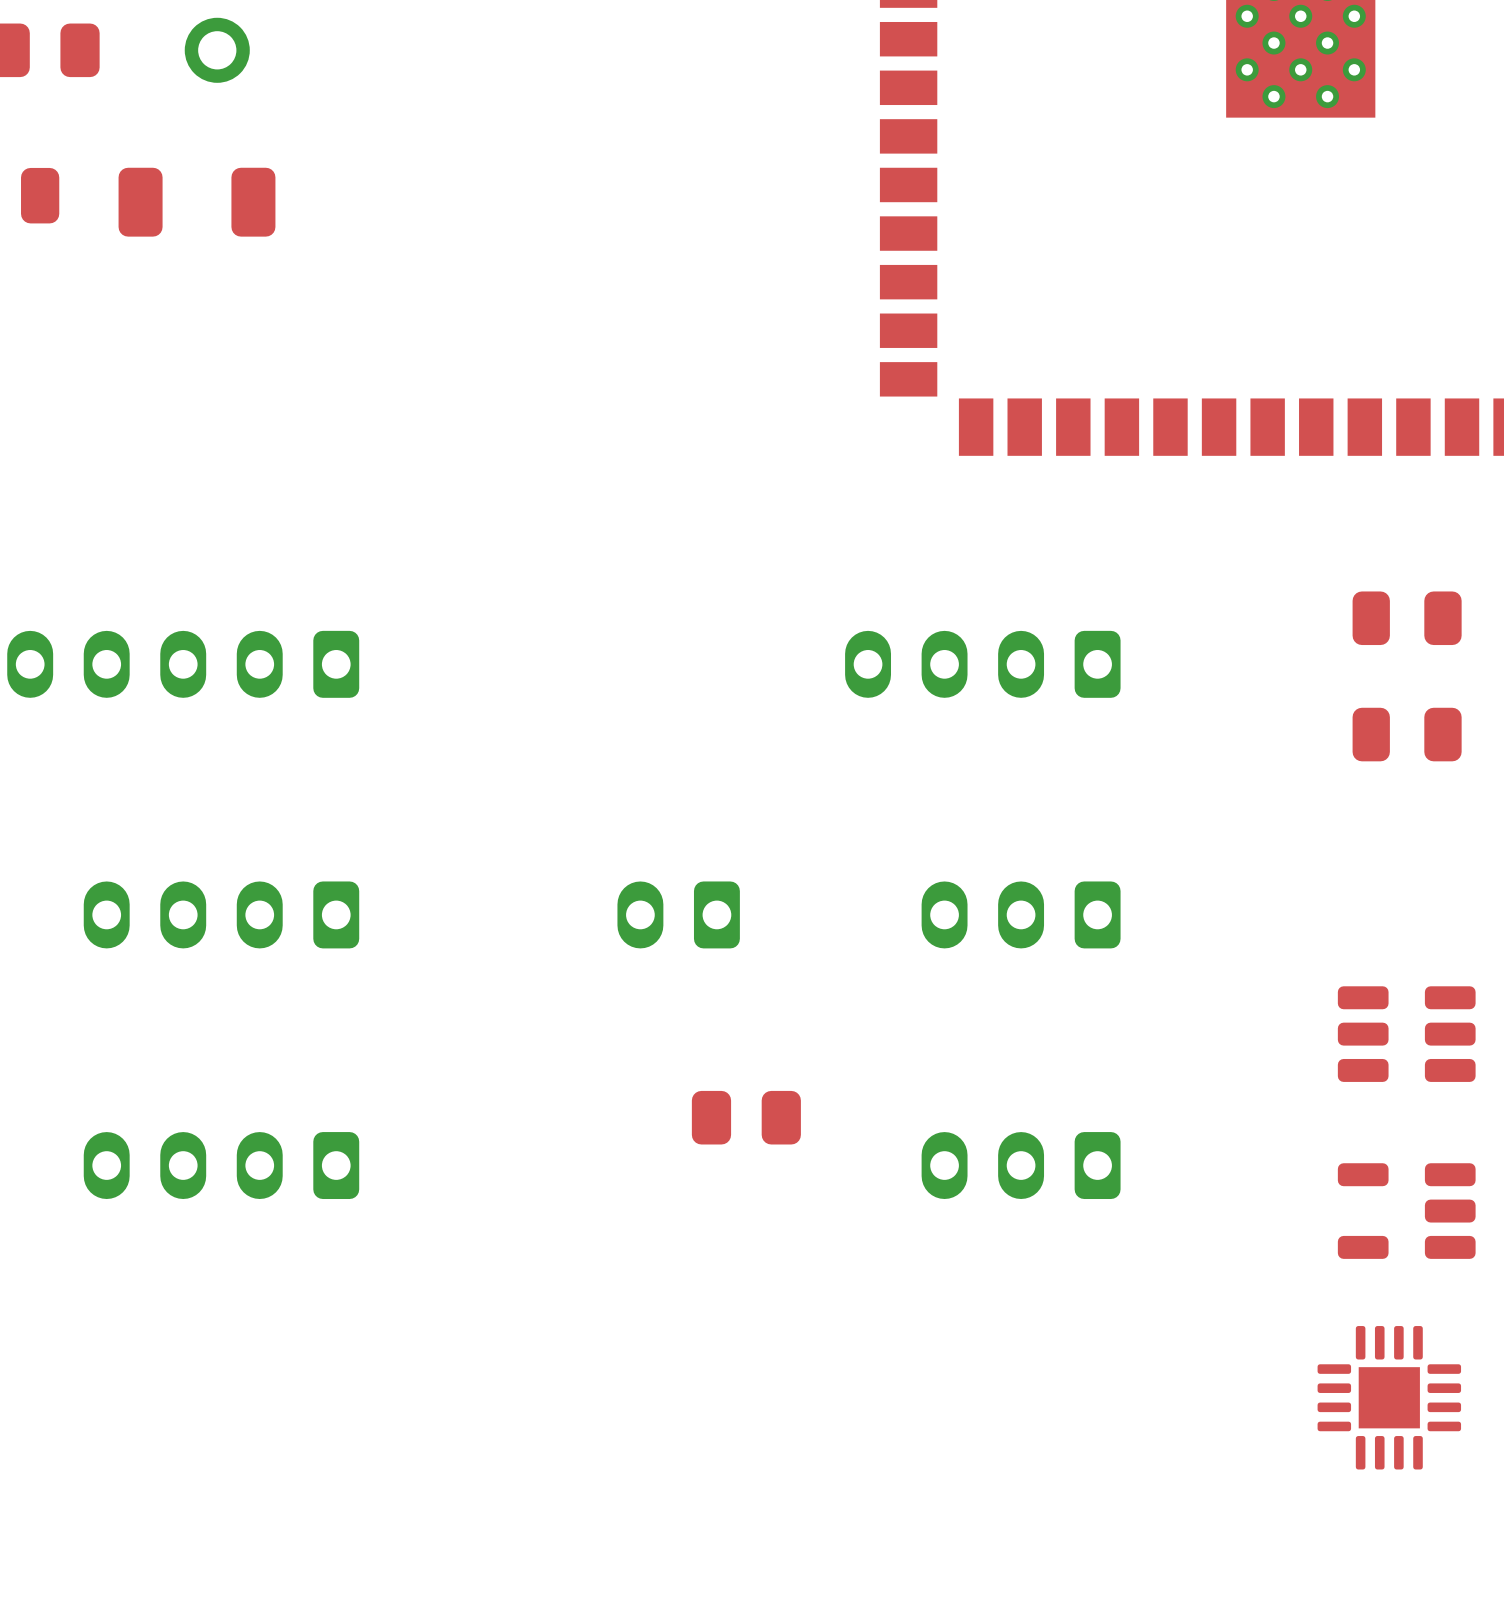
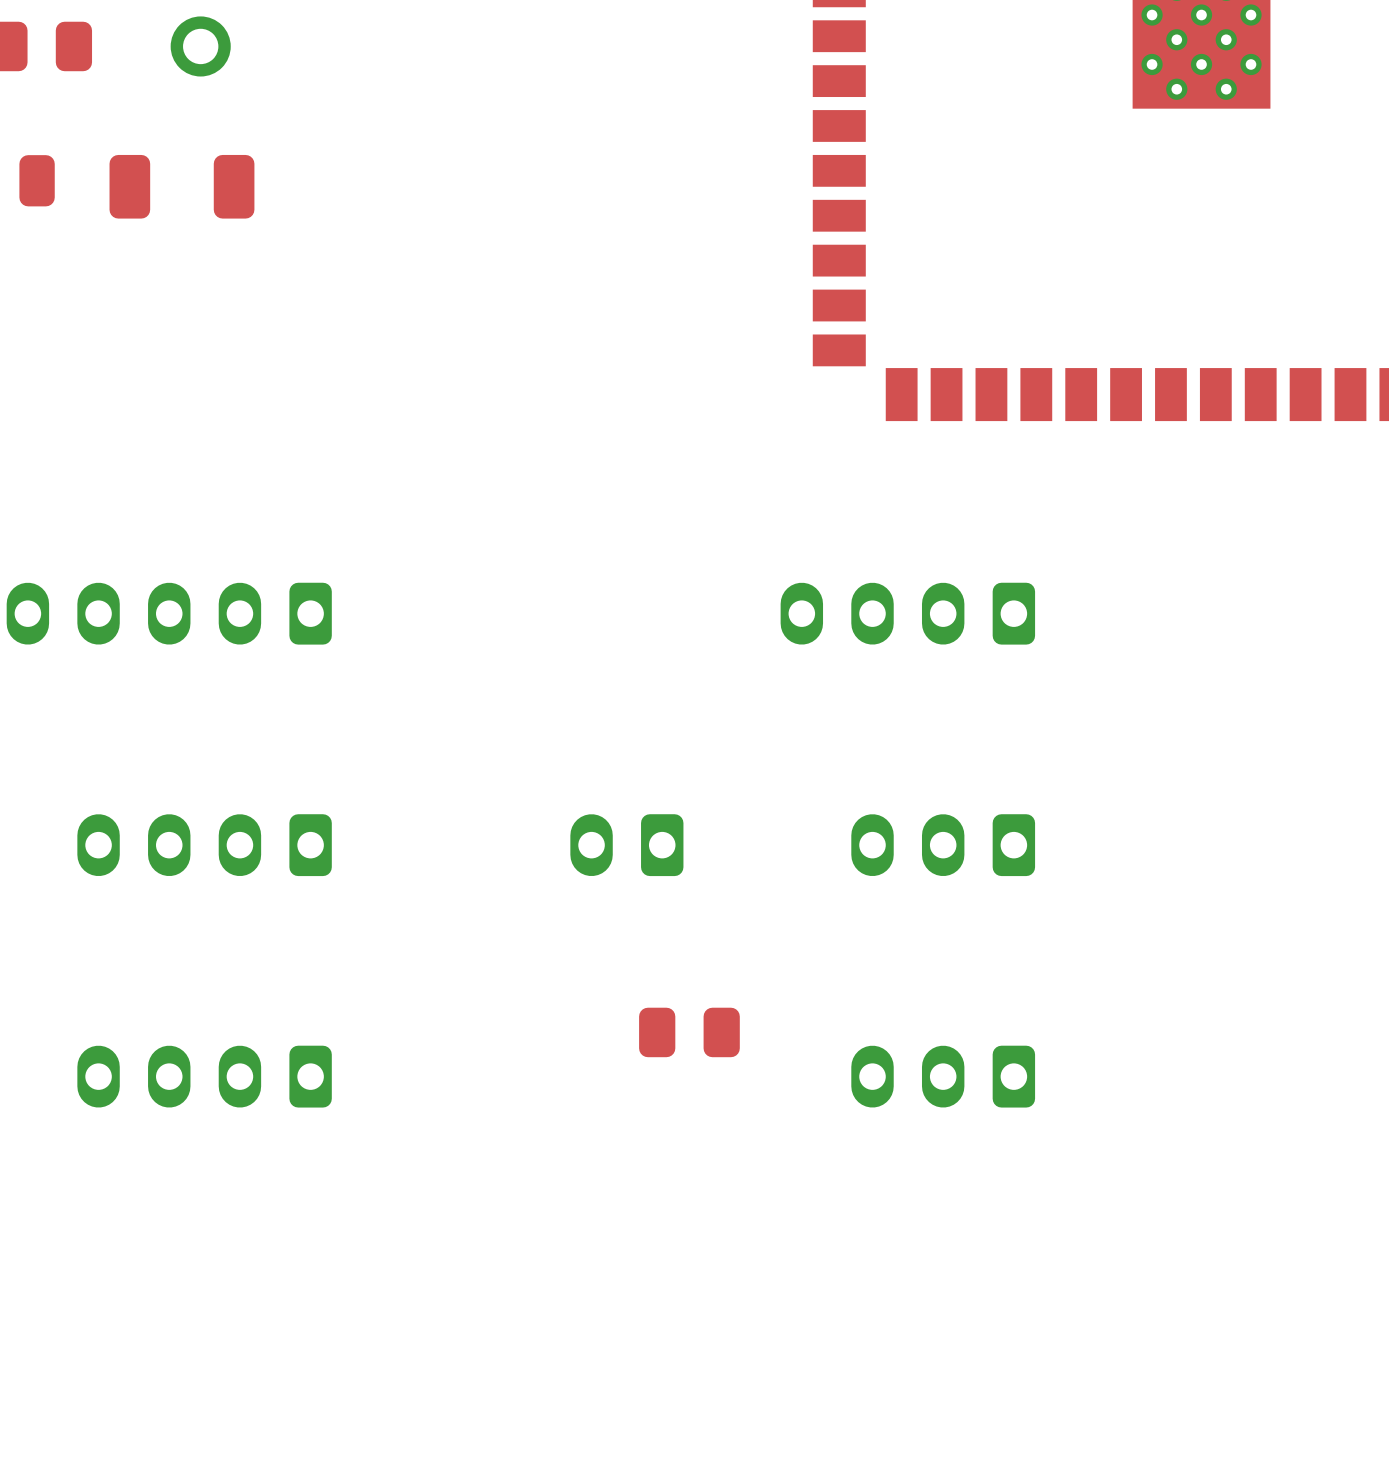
part: (1407, 618) -> none
part: (1407, 734) -> none
part: (1406, 1034) -> none
part: (1406, 1211) -> none
part: (1389, 1397) -> none

